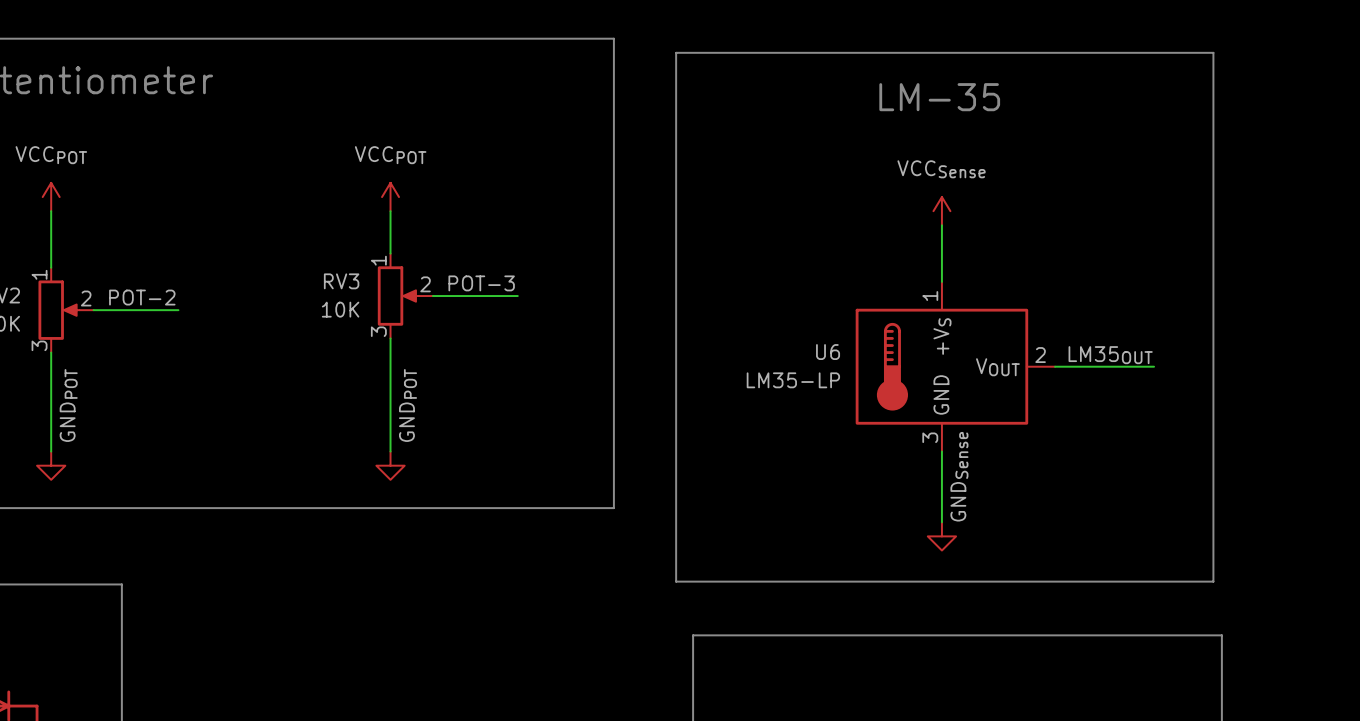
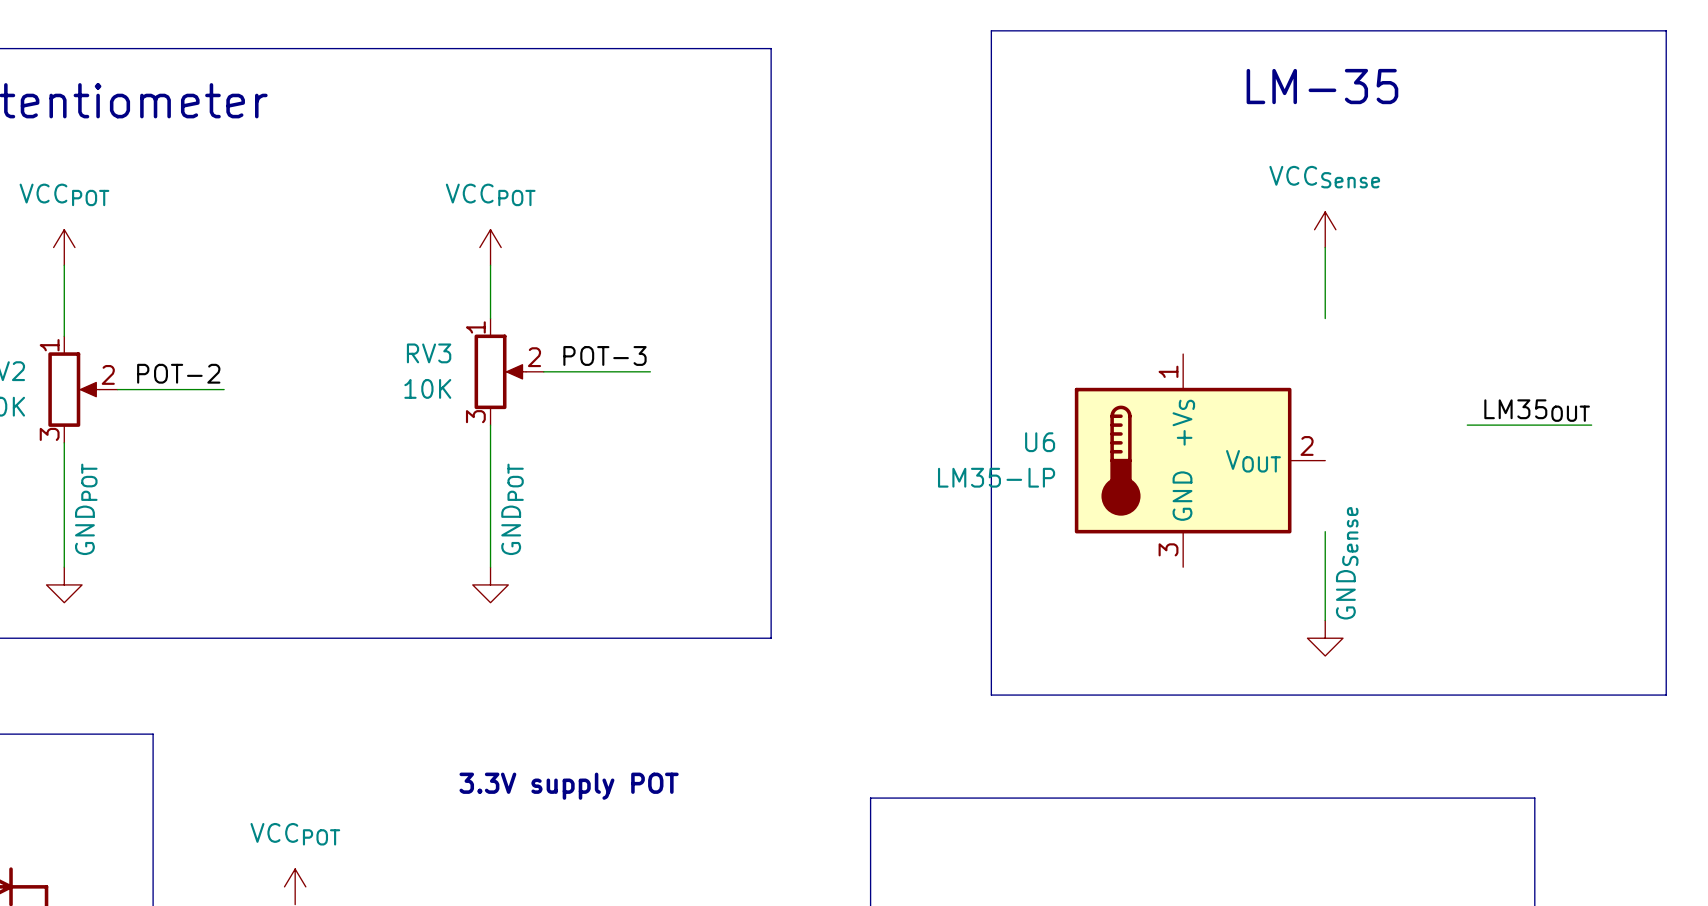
line: (676, 52) (676, 581) (1213, 581) (1213, 52) (676, 52) -> (991, 30) (991, 695) (1666, 695) (1666, 30) (991, 30)
text position: LM-35 (939, 97) -> LM-35 (1322, 86)
power symbol position: VCCSense (941, 211) -> VCCSense (1325, 229)
wire: (941, 225) (941, 281) -> (1325, 247) (1325, 318)
label position: LM35OUT (1110, 355) -> LM35OUT (1537, 410)
wire: (1055, 366) (1154, 366) -> (1467, 425) (1591, 425)
wire: (941, 451) (941, 522) -> (1325, 531) (1325, 620)
power symbol position: GNDSense (941, 536) -> GNDSense (1325, 638)
text: none -> 3.3V supply POT (569, 786)
power symbol: none -> VCCPOT (295, 886)

